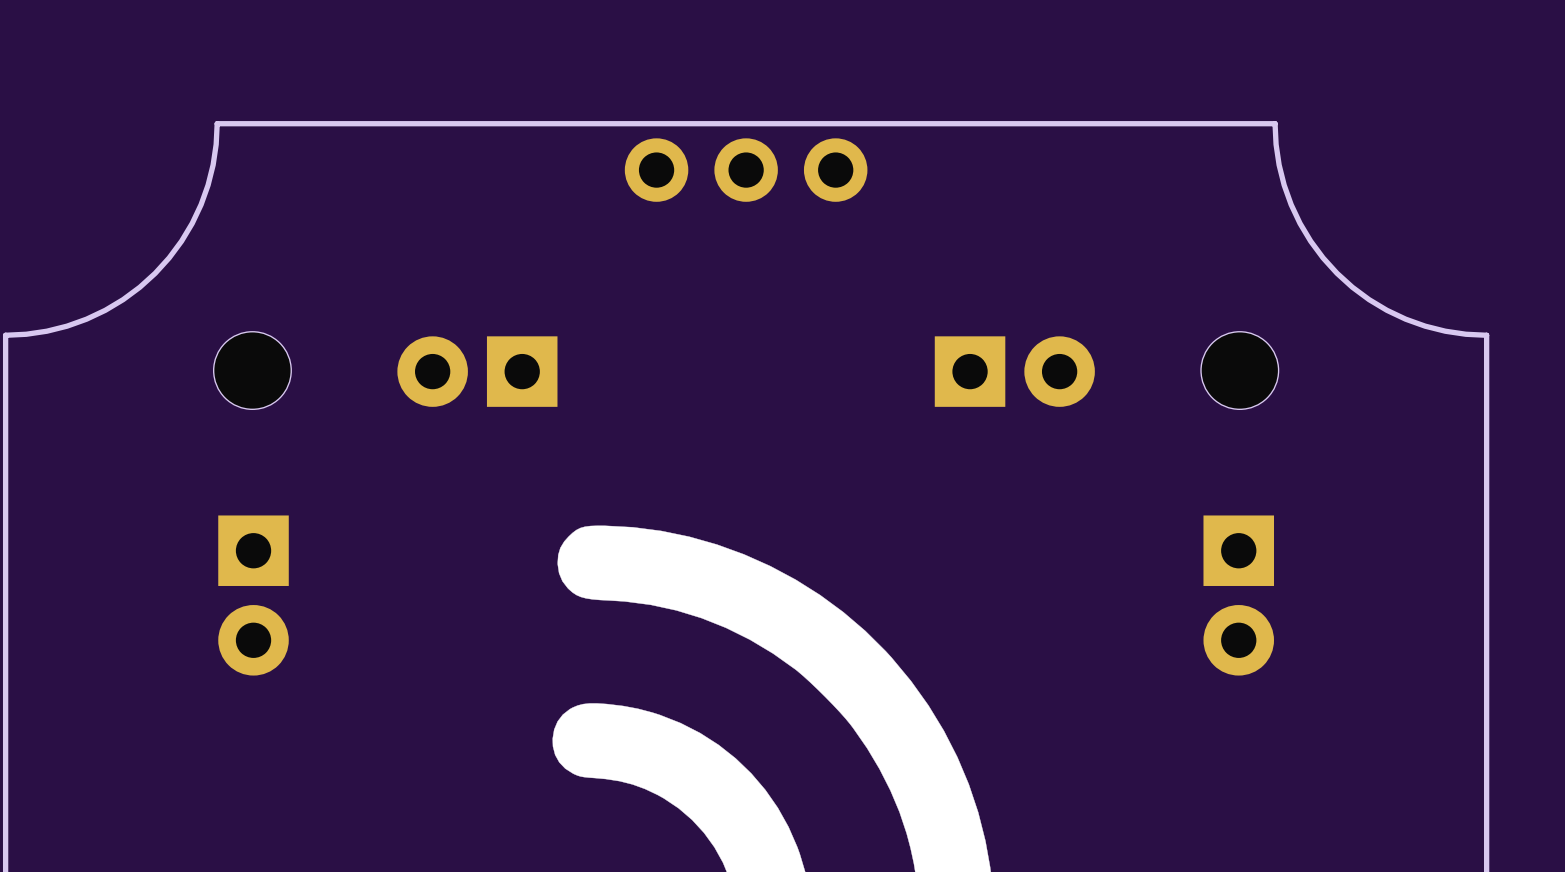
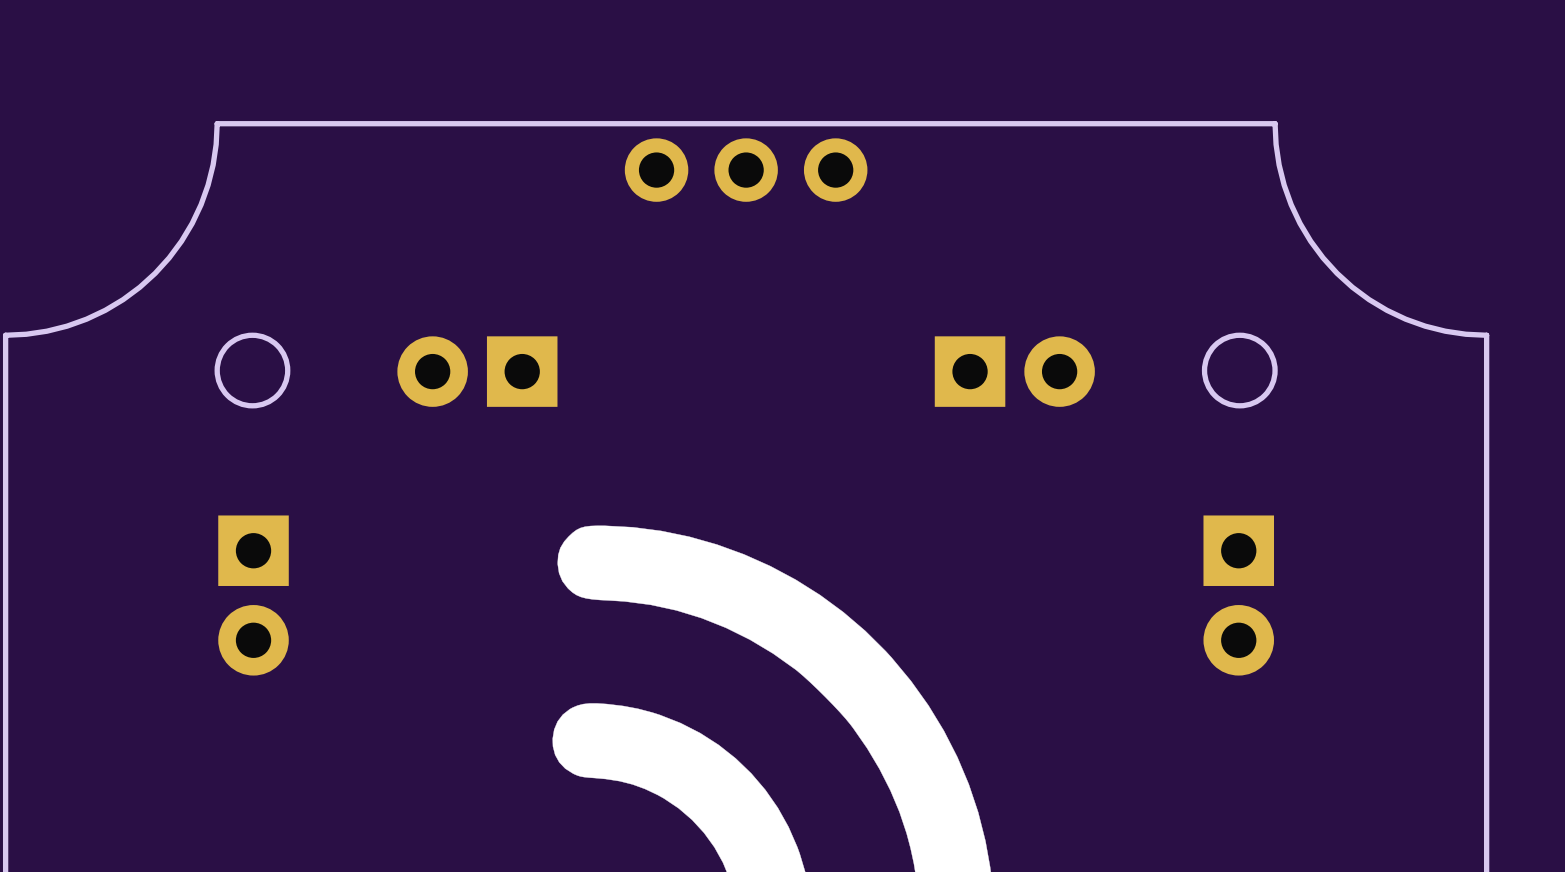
round board edge: none -> [214, 332, 291, 409]
round board edge: none -> [1201, 332, 1278, 409]
part: (252, 370) -> none
part: (1239, 370) -> none

